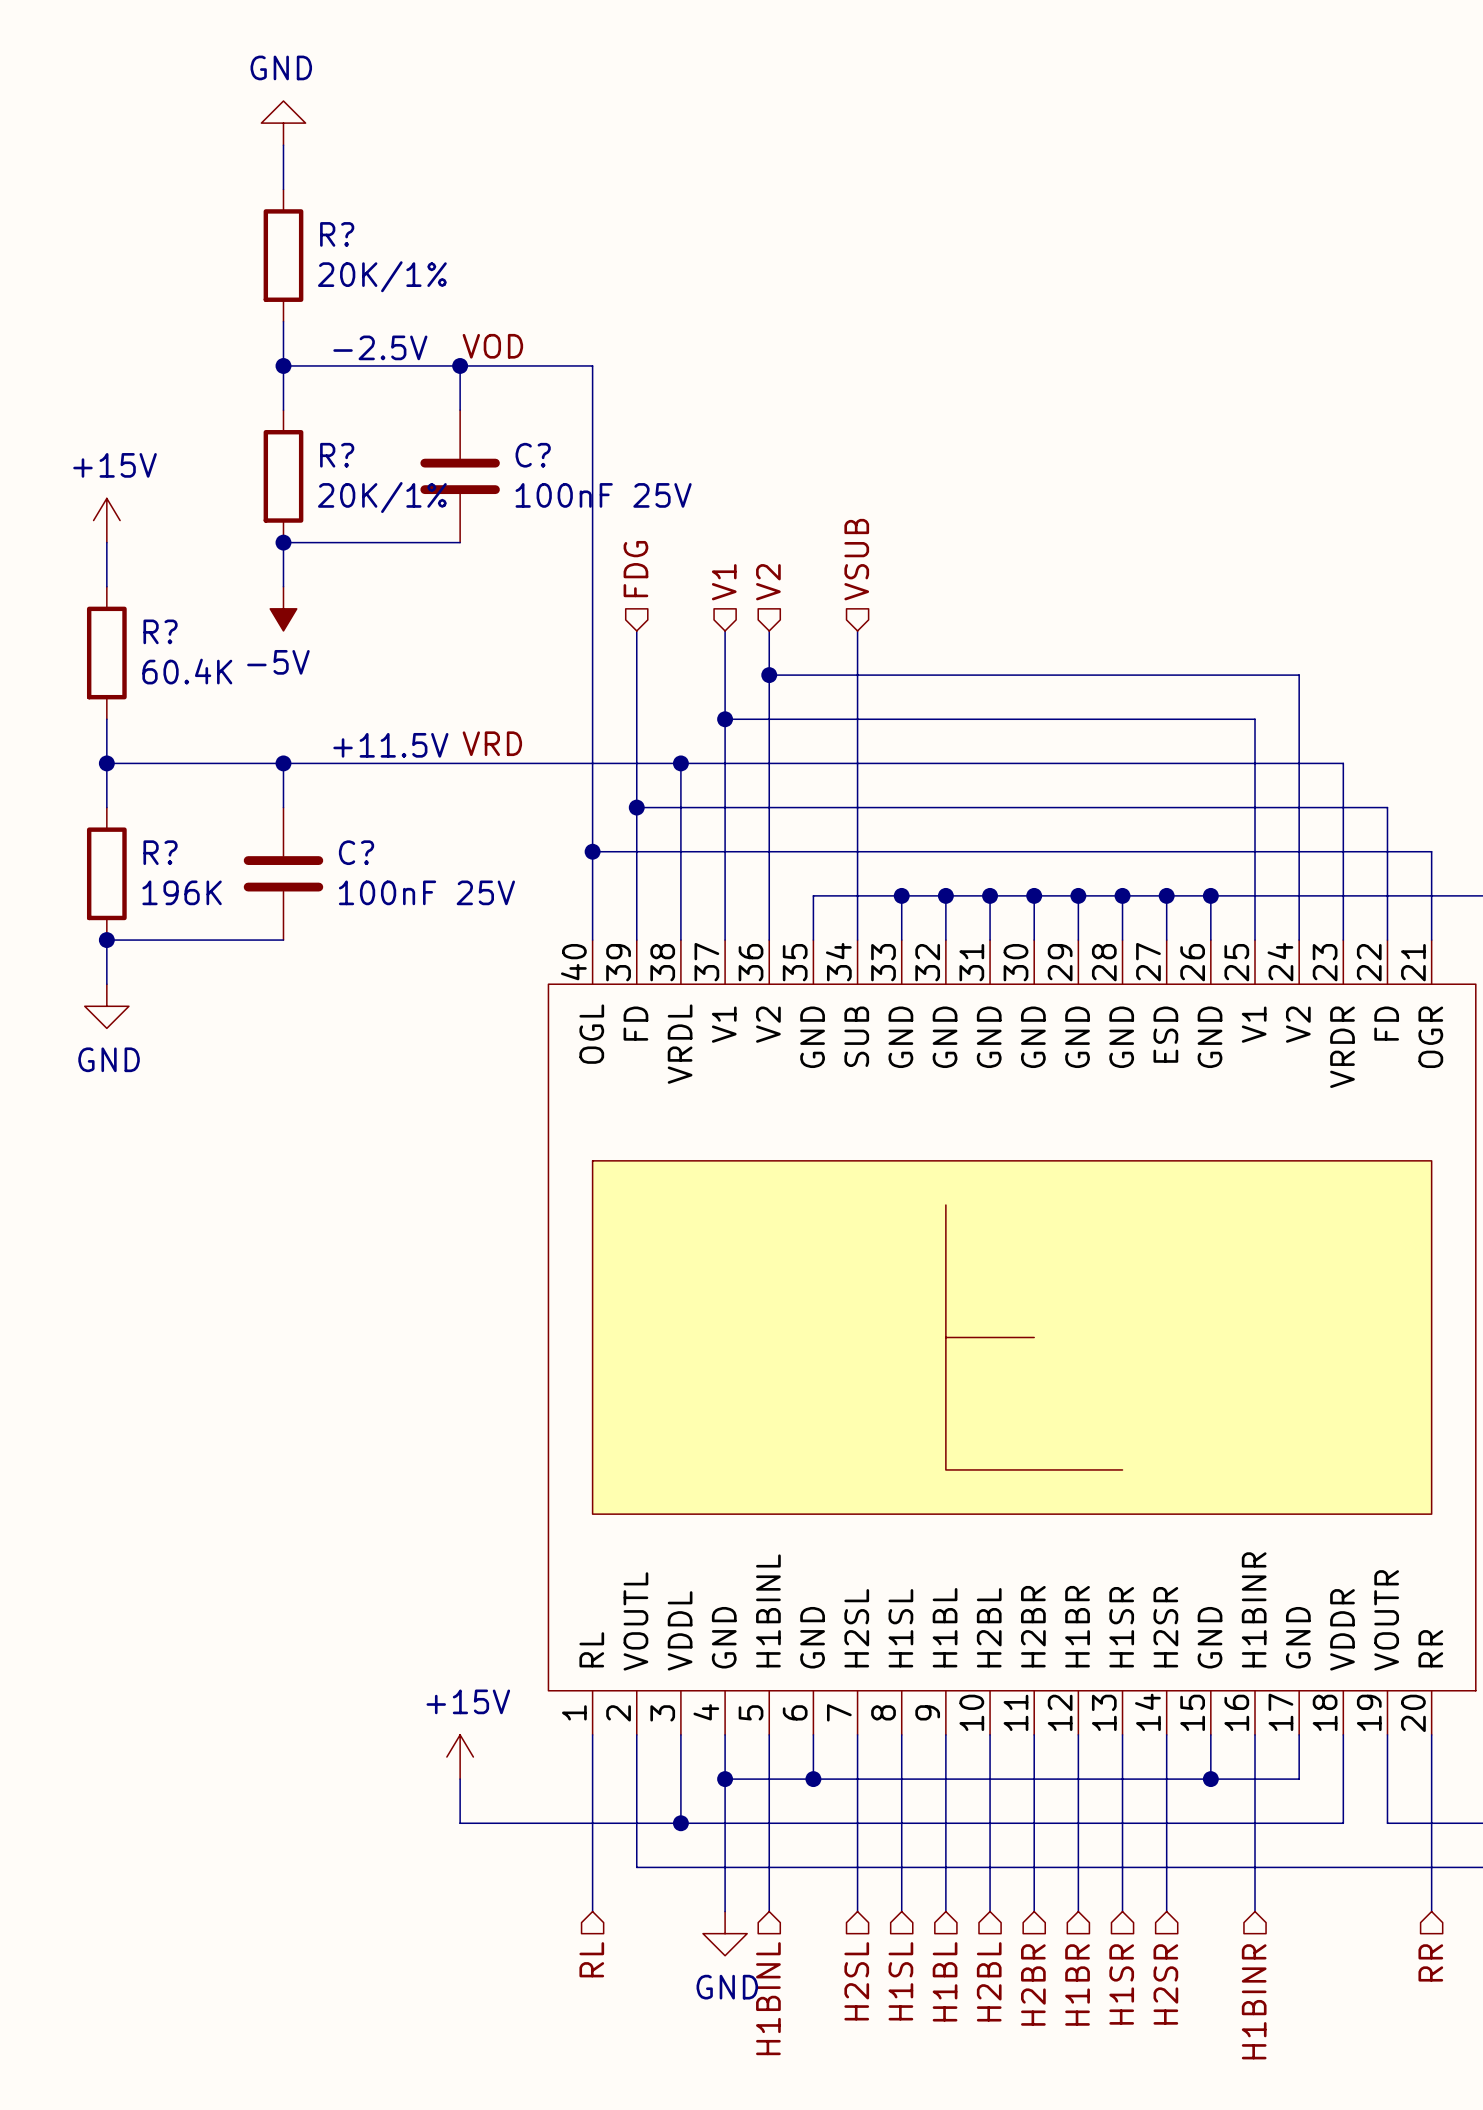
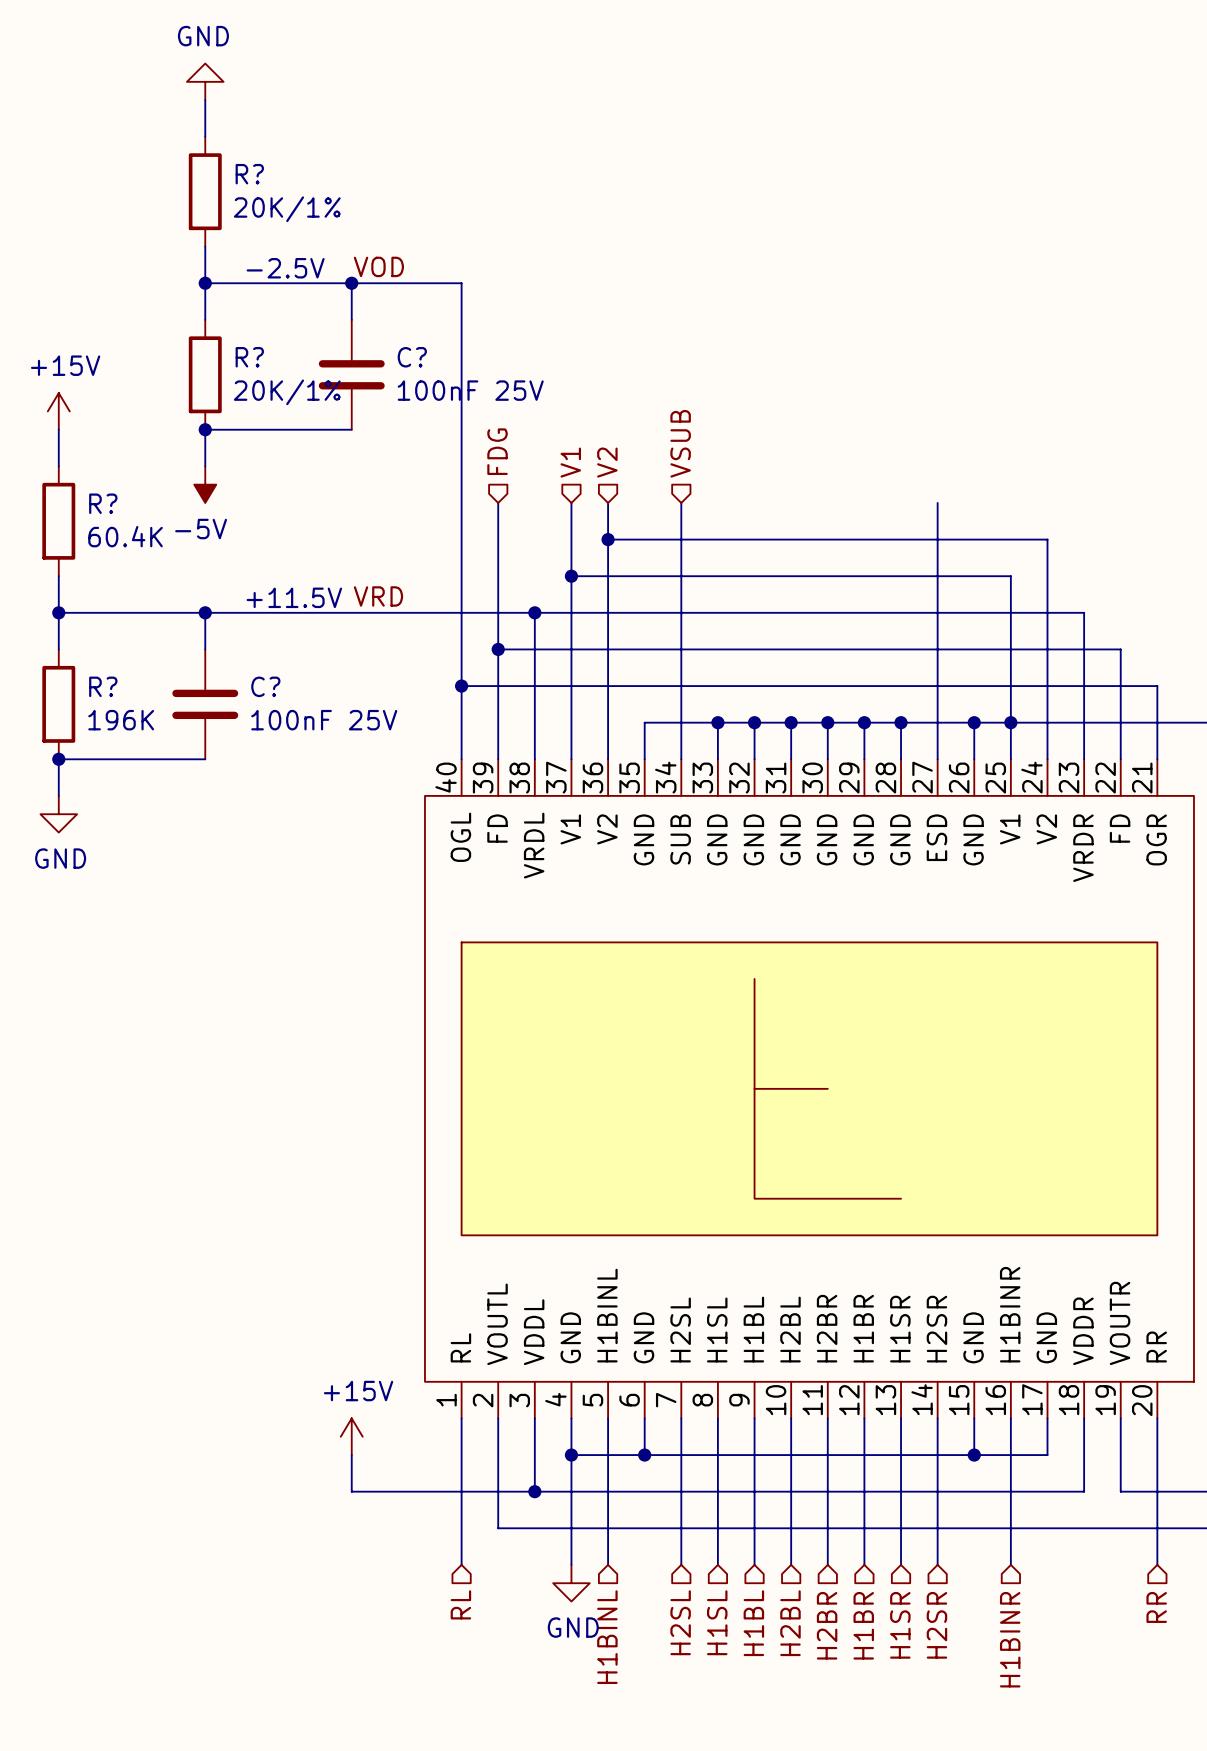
wire: none -> (937, 502) (937, 722)
junction position: (1166, 895) -> (1010, 722)

